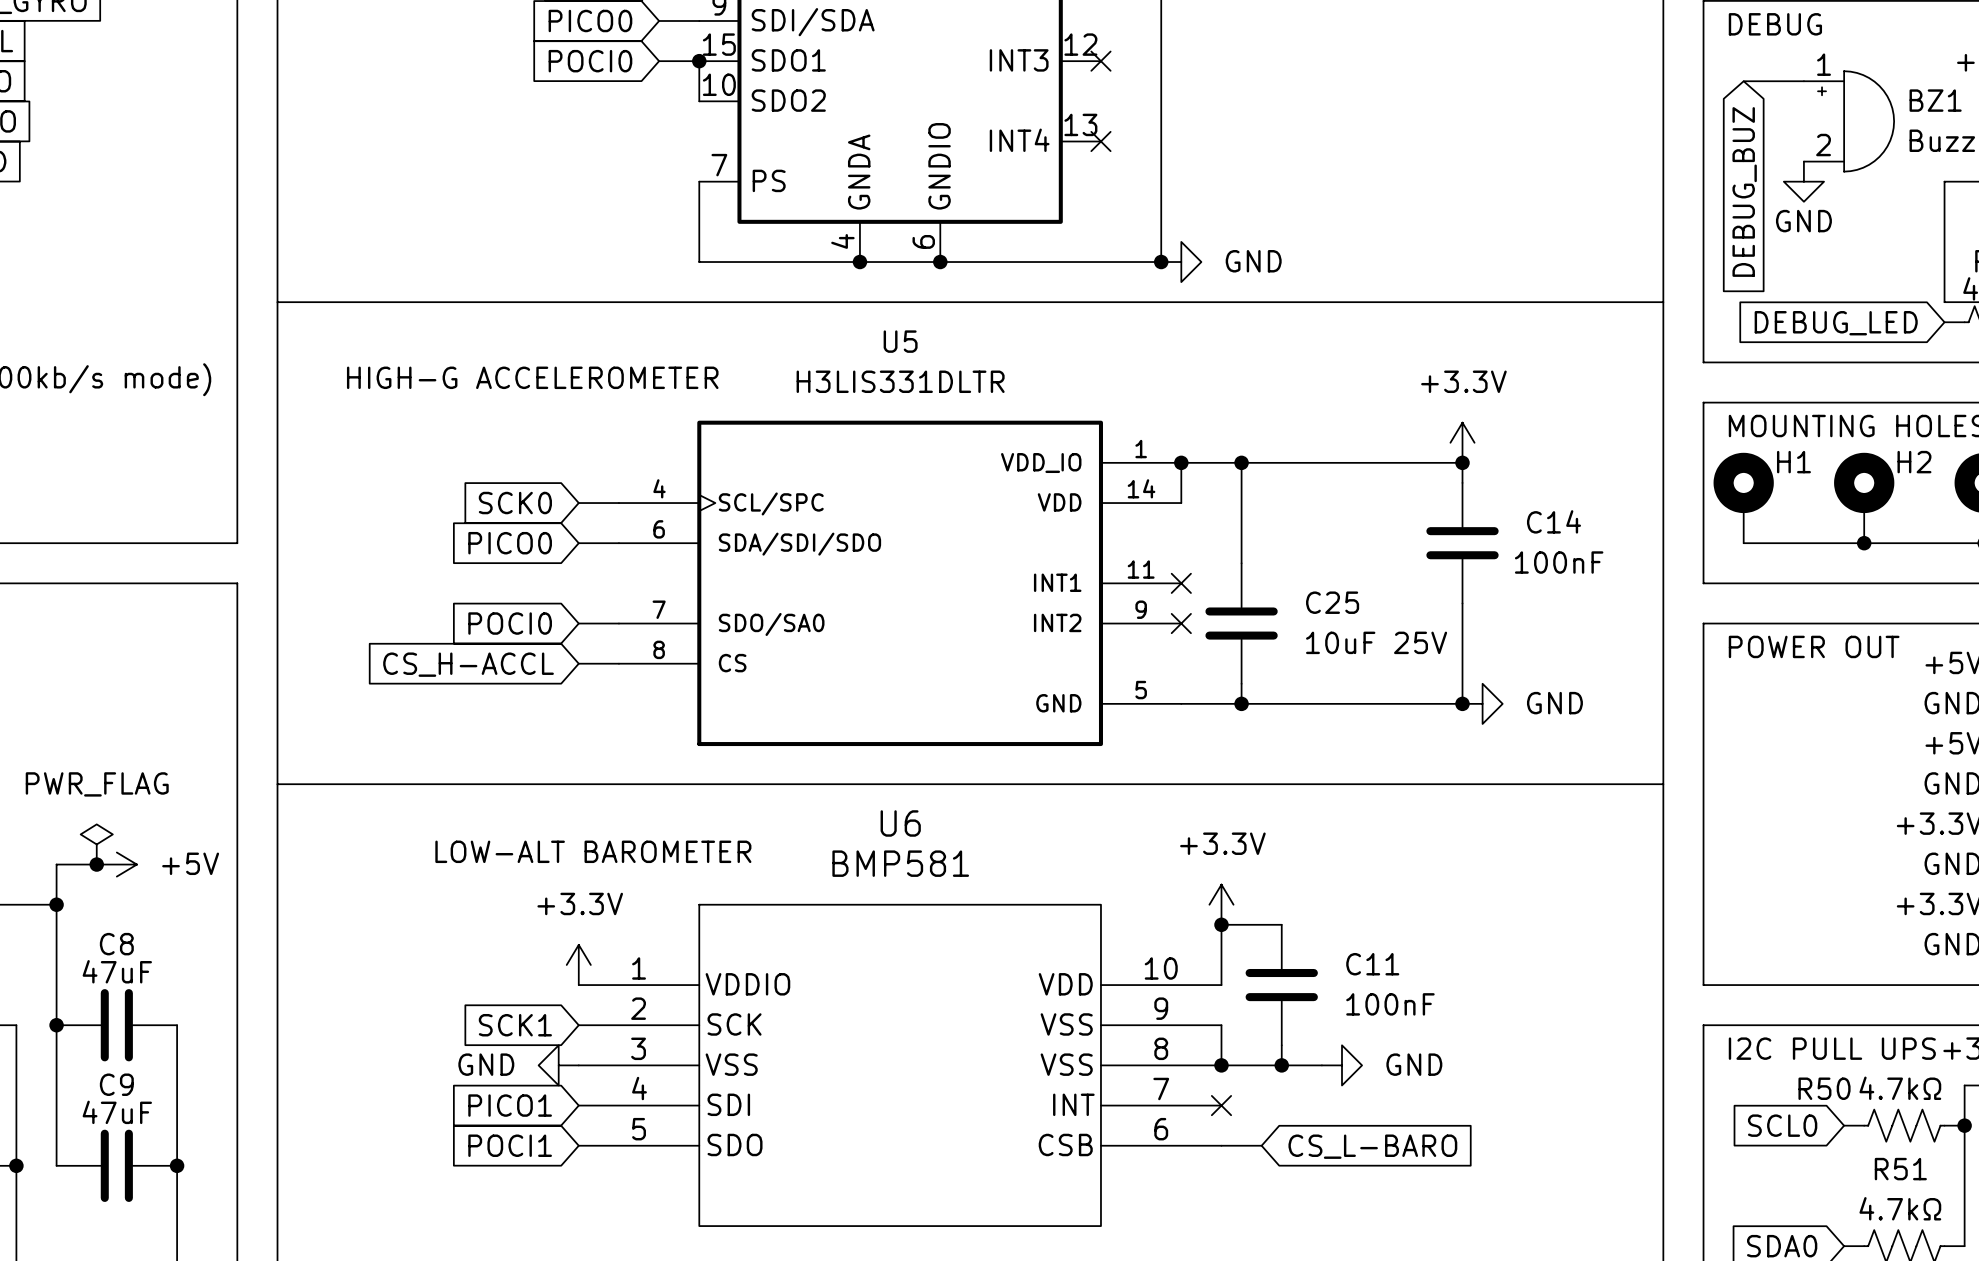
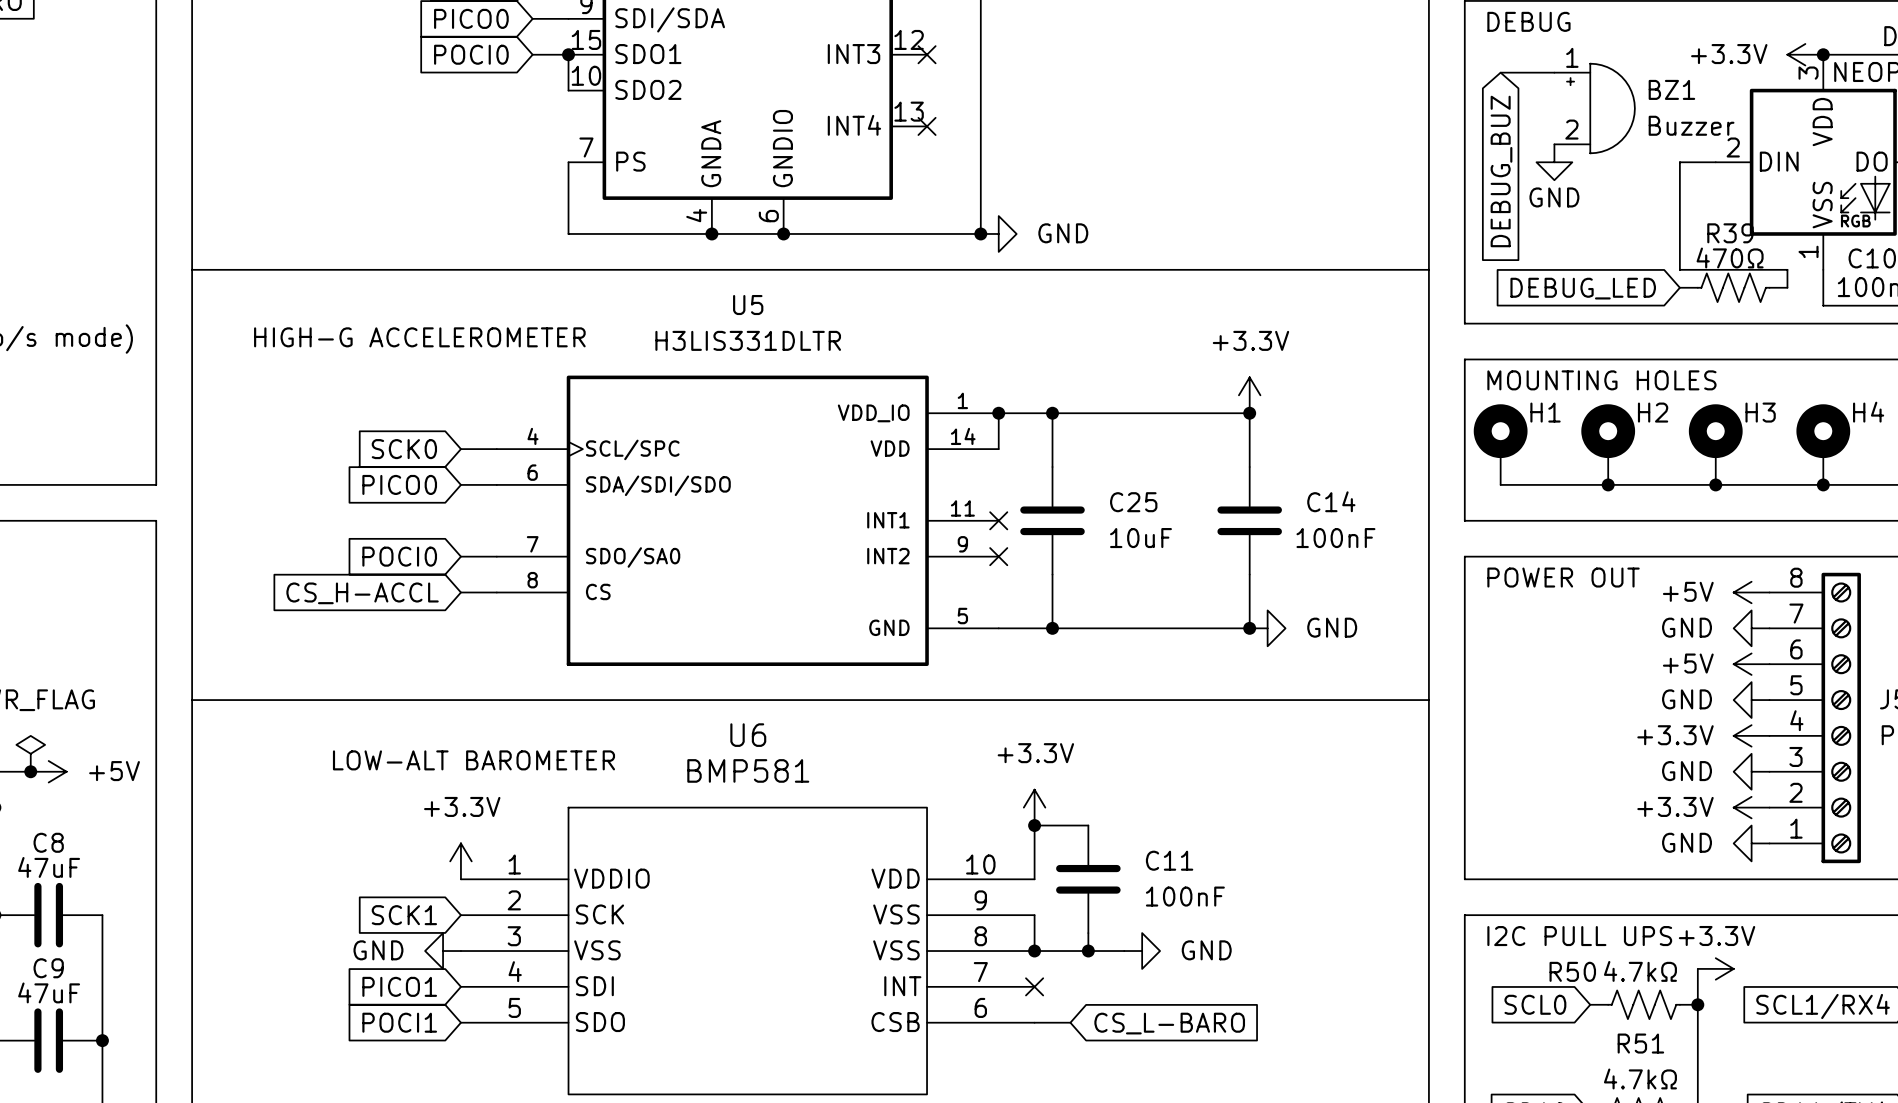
C14 position: (1462, 543) -> (1249, 520)
C25 position: (1241, 623) -> (1052, 520)
C25 value: 10uF 25V (1376, 642) -> 10uF (1140, 538)

